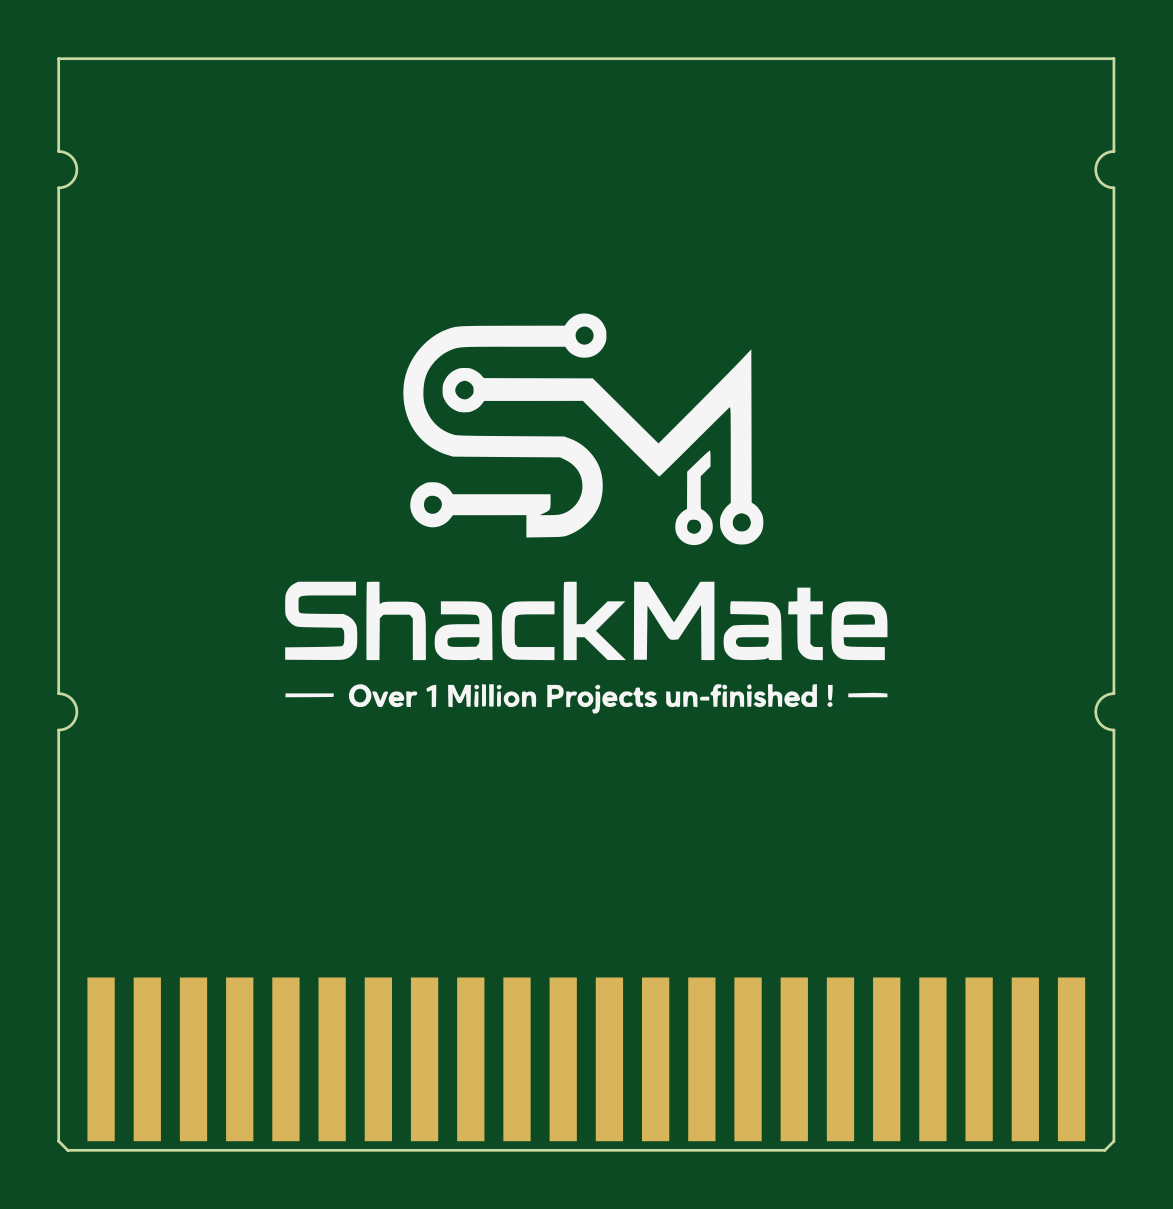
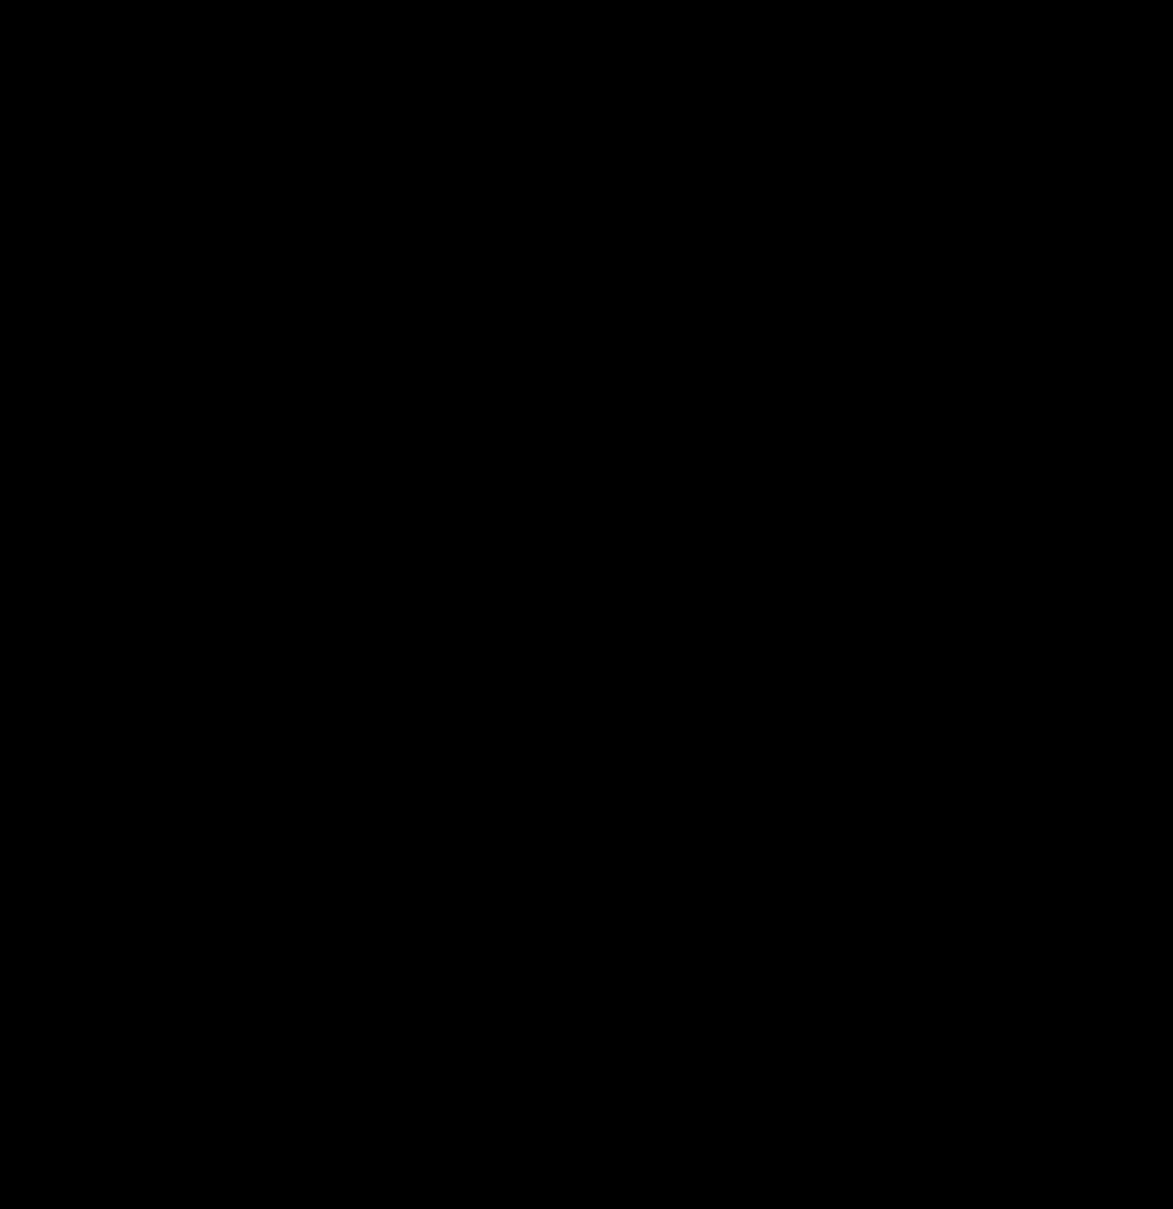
board edge: (1113, 58) (58, 58) (58, 151) (71, 156) (76, 169) (71, 182) (58, 187) (58, 693) (71, 698) (76, 711) (71, 724) (58, 730) (58, 1141) (67, 1150) (1104, 1150) (1113, 1141) (1113, 730) (1101, 724) (1095, 711) (1101, 698) (1113, 693) (1113, 187) (1101, 182) (1095, 169) (1101, 156) (1113, 151) (1113, 58) -> none
drawing: [285, 313, 888, 714] -> none
part: (586, 1059) -> none

